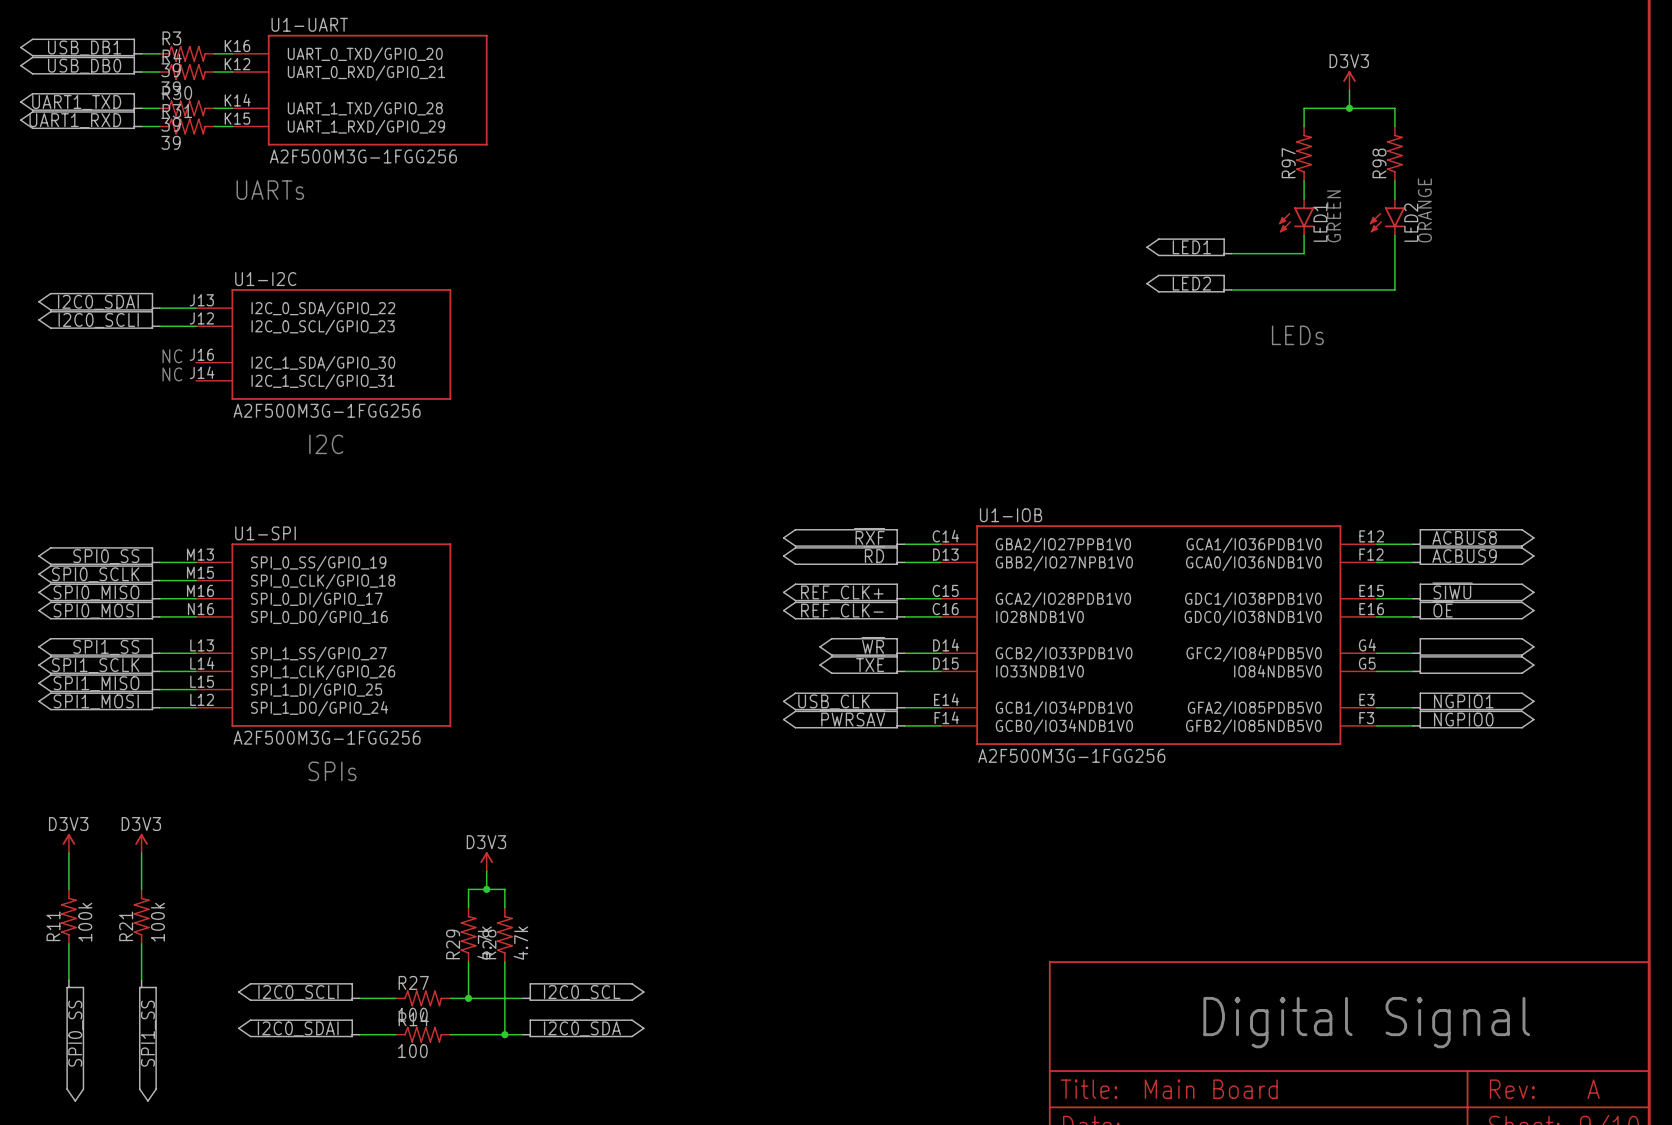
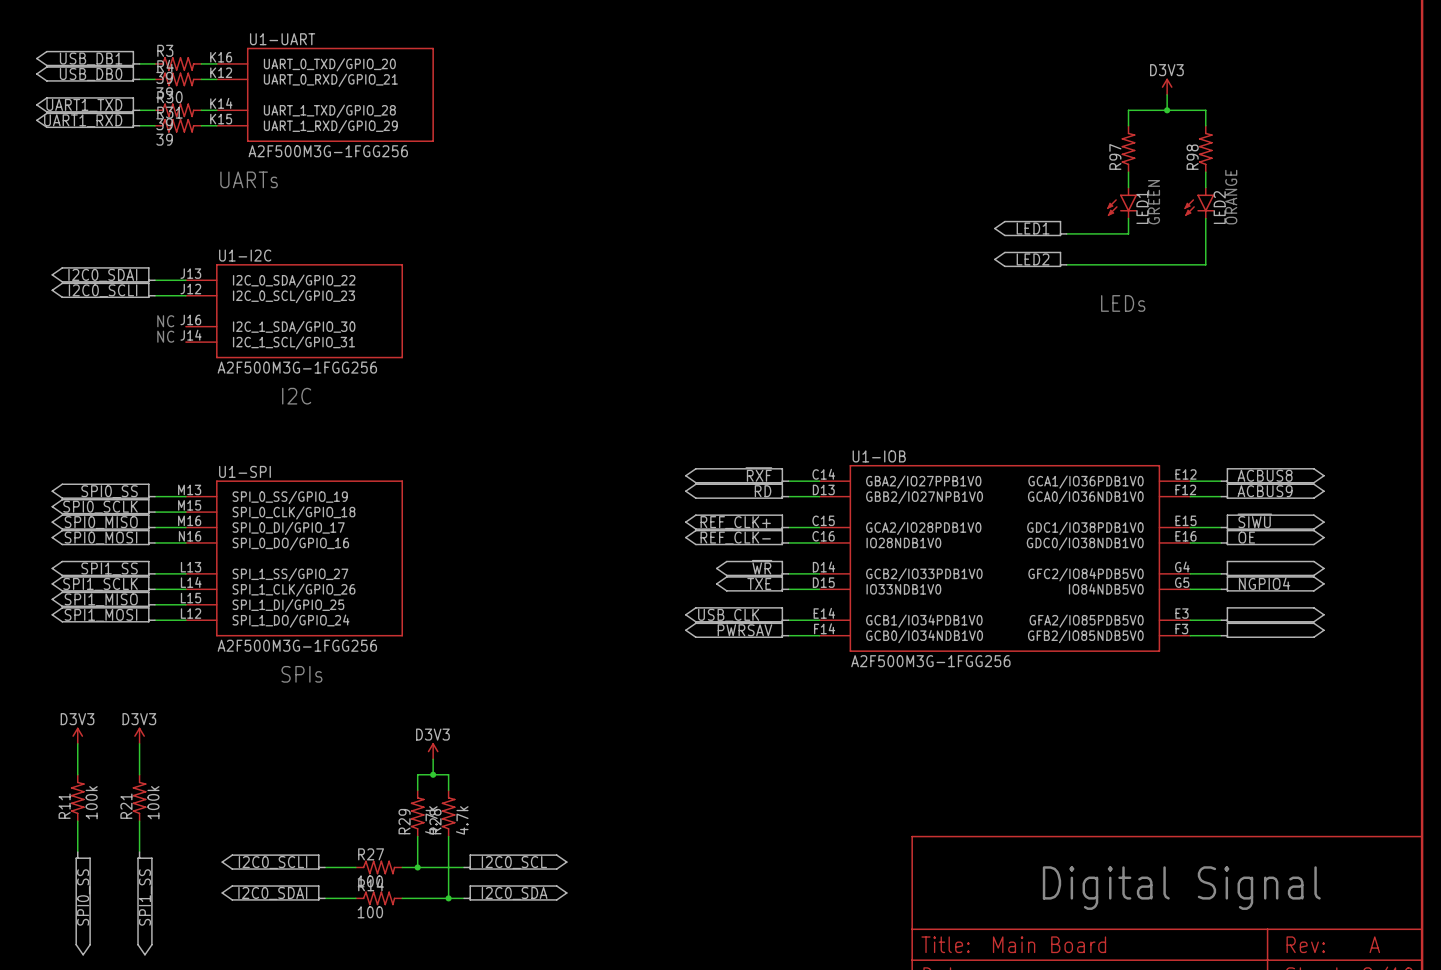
label: none -> NGPIO4 (1264, 583)
label: NGPIO1 (1463, 701) -> none
label: NGPIO0 (1463, 719) -> none

